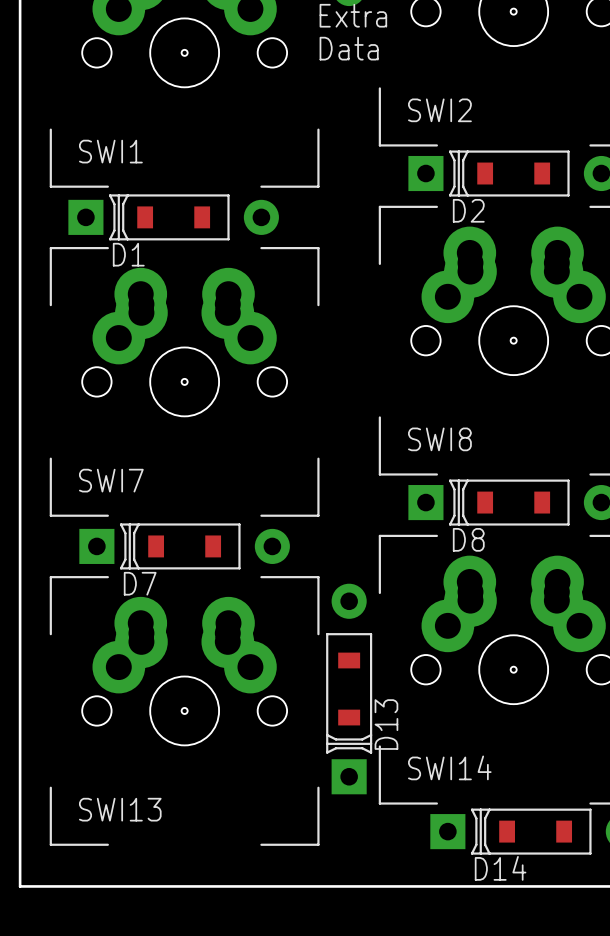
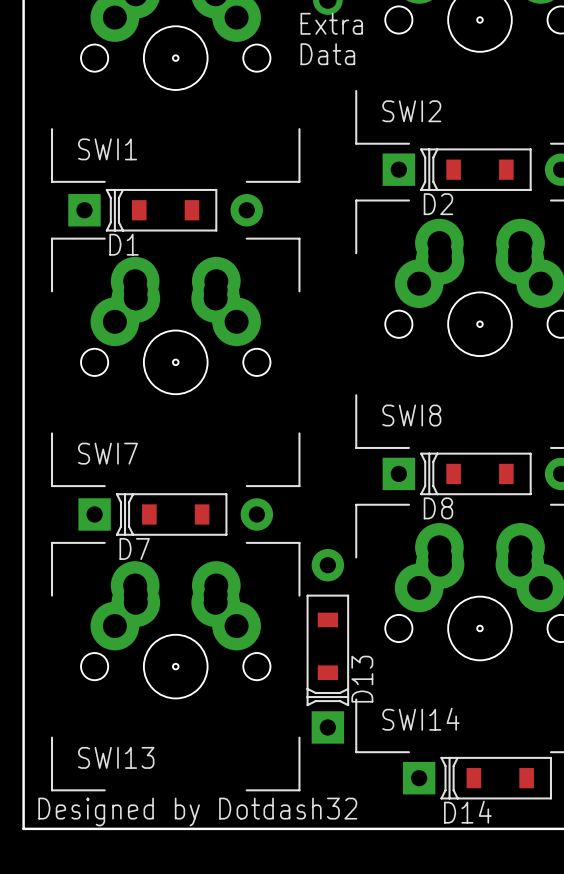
text: none -> Designed by Dotdash32 (197, 811)

